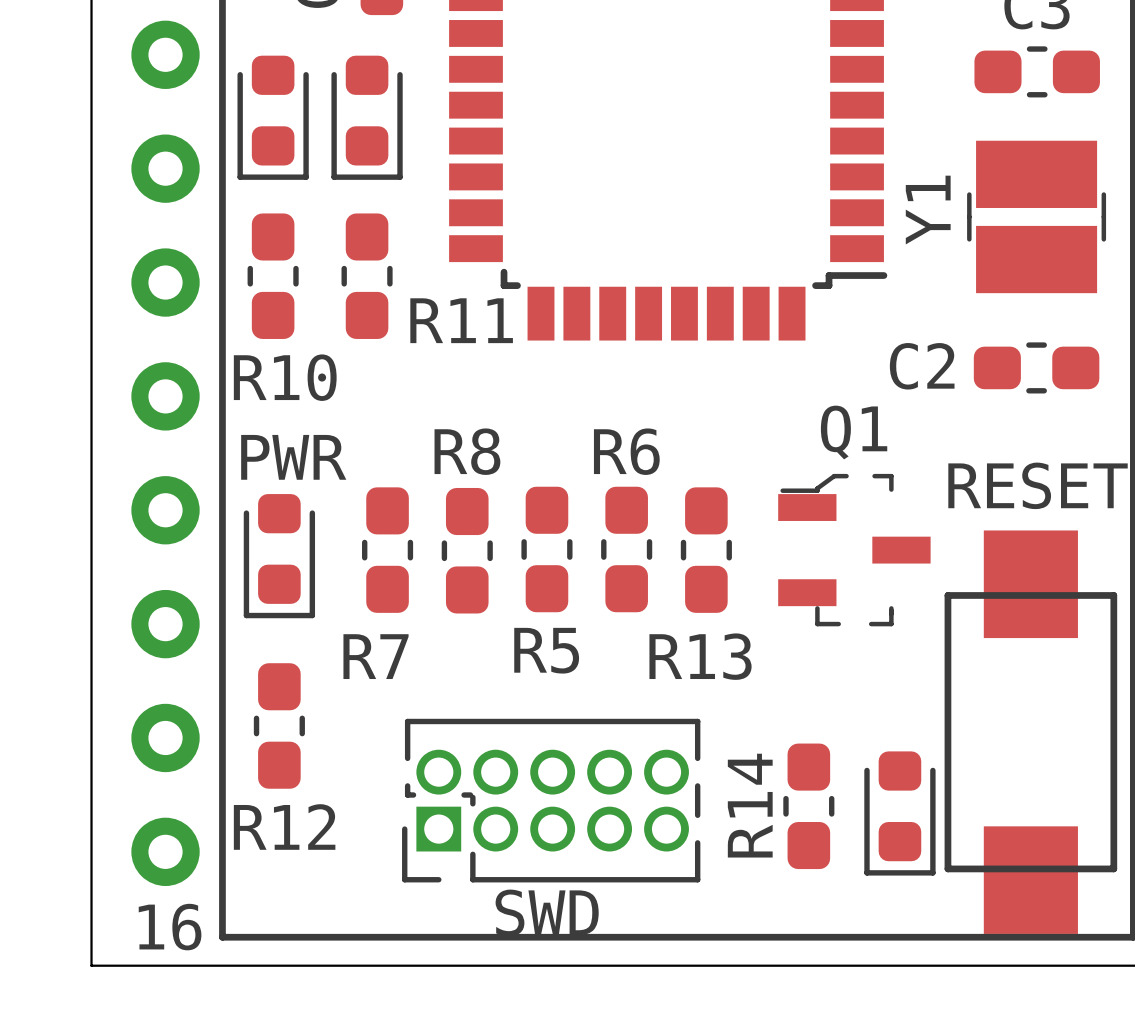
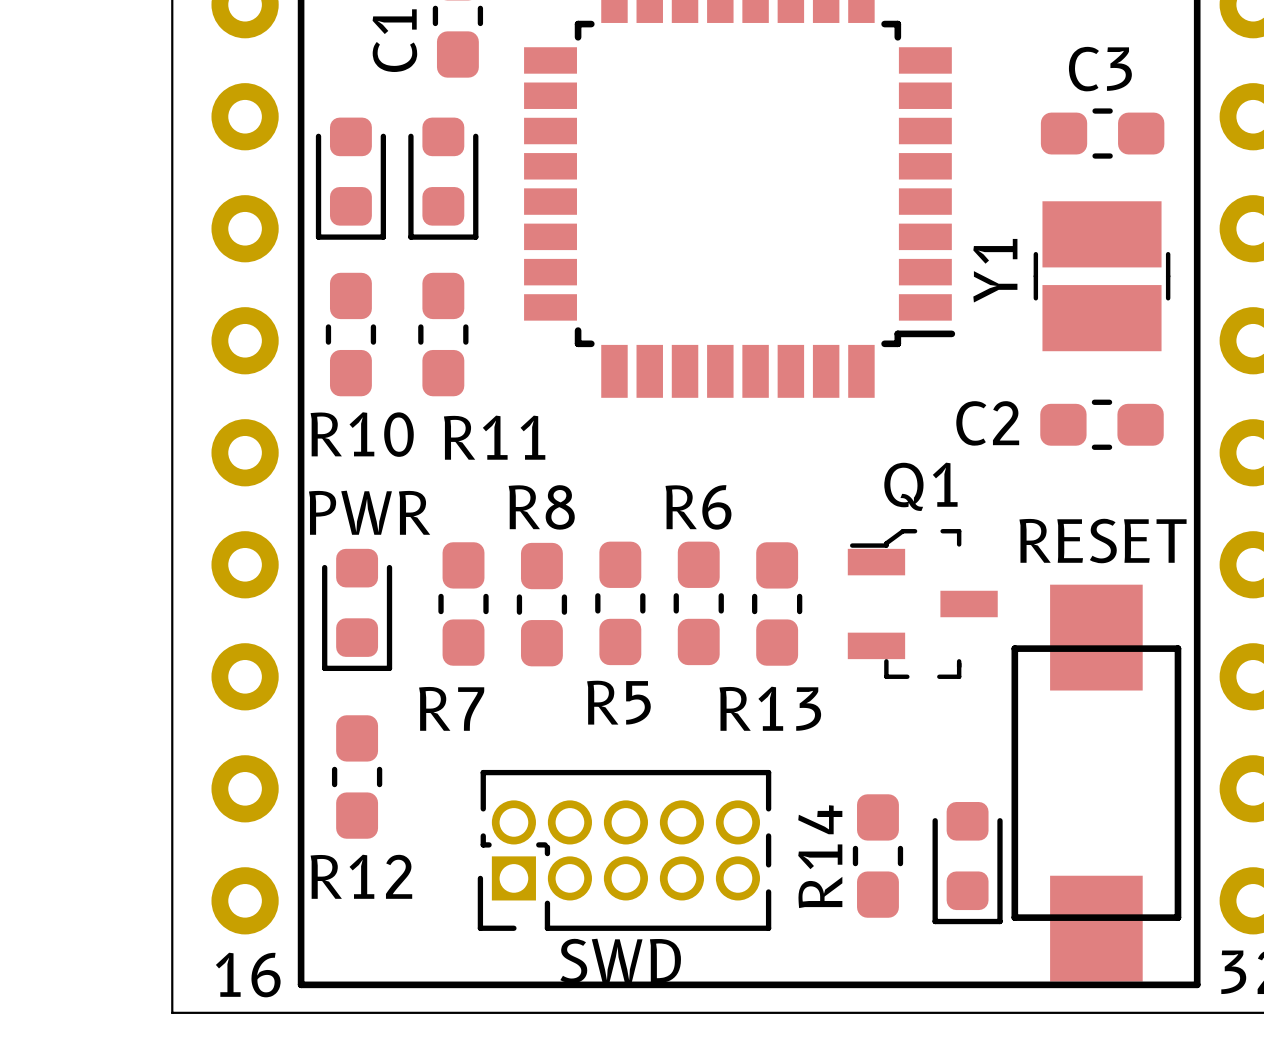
R11 name position: R11 (461, 320) -> R11 (494, 437)

